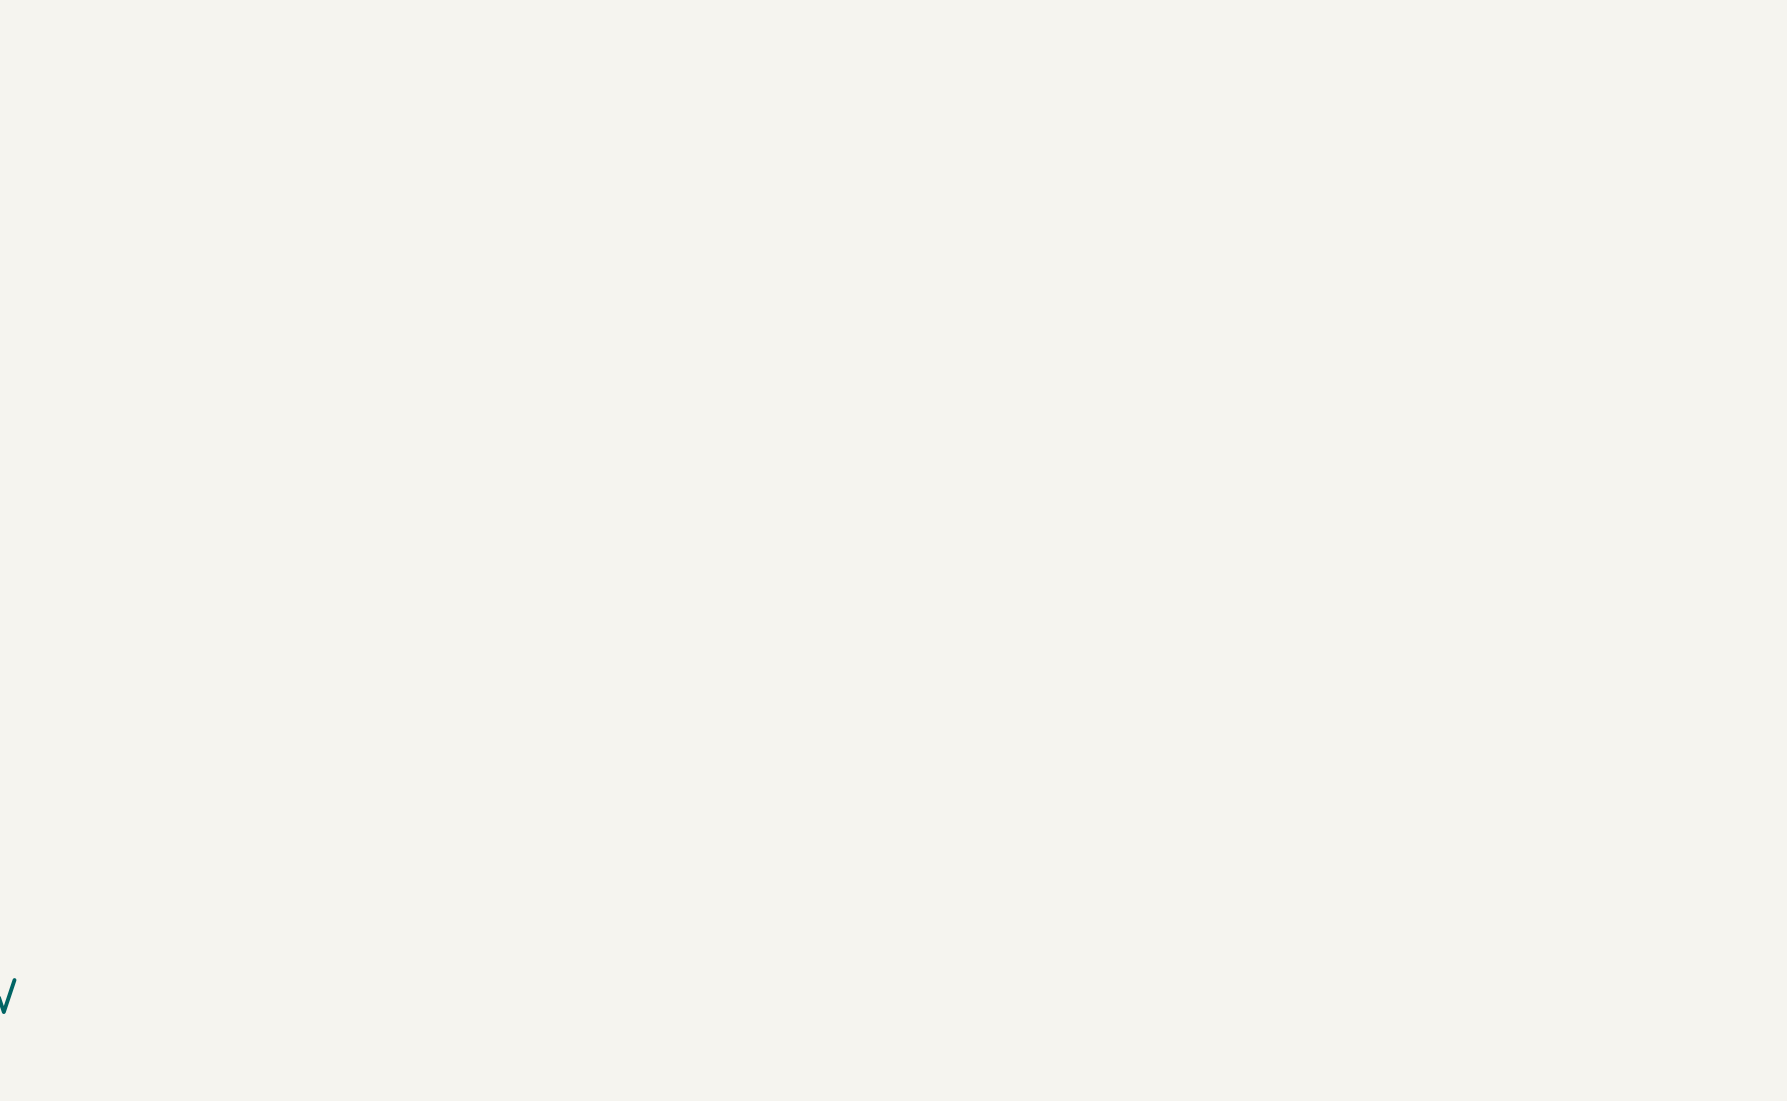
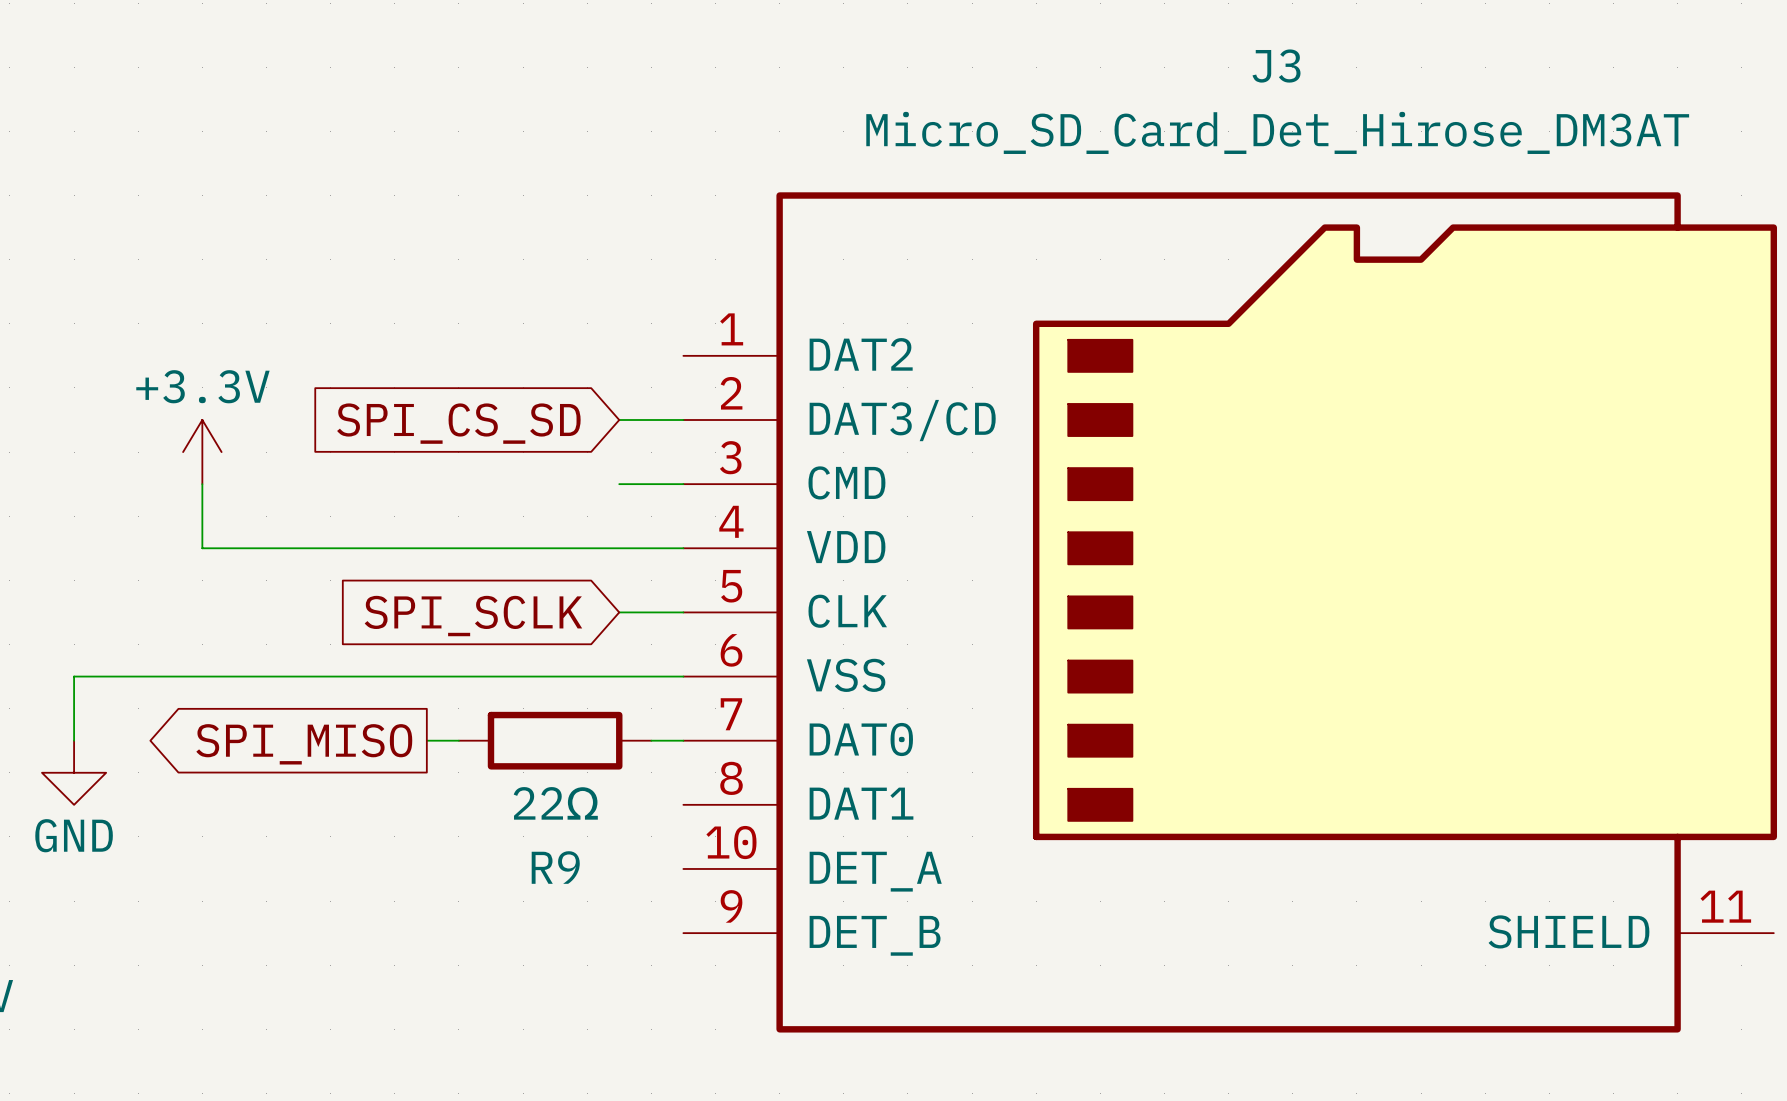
wire: none -> (619, 419) (683, 419)
global label: none -> SPI_CS_SD (458, 423)
power symbol: none -> +3.3V (202, 452)
wire: none -> (202, 484) (202, 548) (683, 548)
wire: none -> (619, 484) (683, 484)
wire: none -> (619, 612) (683, 612)
J3: none -> Micro_SD_Card_Det_Hirose_DM3AT (1230, 612)
global label: none -> SPI_SCLK (473, 616)
wire: none -> (683, 676) (74, 676) (74, 740)
wire: none -> (426, 740) (458, 740)
R9: none -> 22Ω (555, 740)
wire: none -> (651, 740) (683, 740)
global label: none -> SPI_MISO (304, 744)
power symbol: none -> GND (74, 772)

